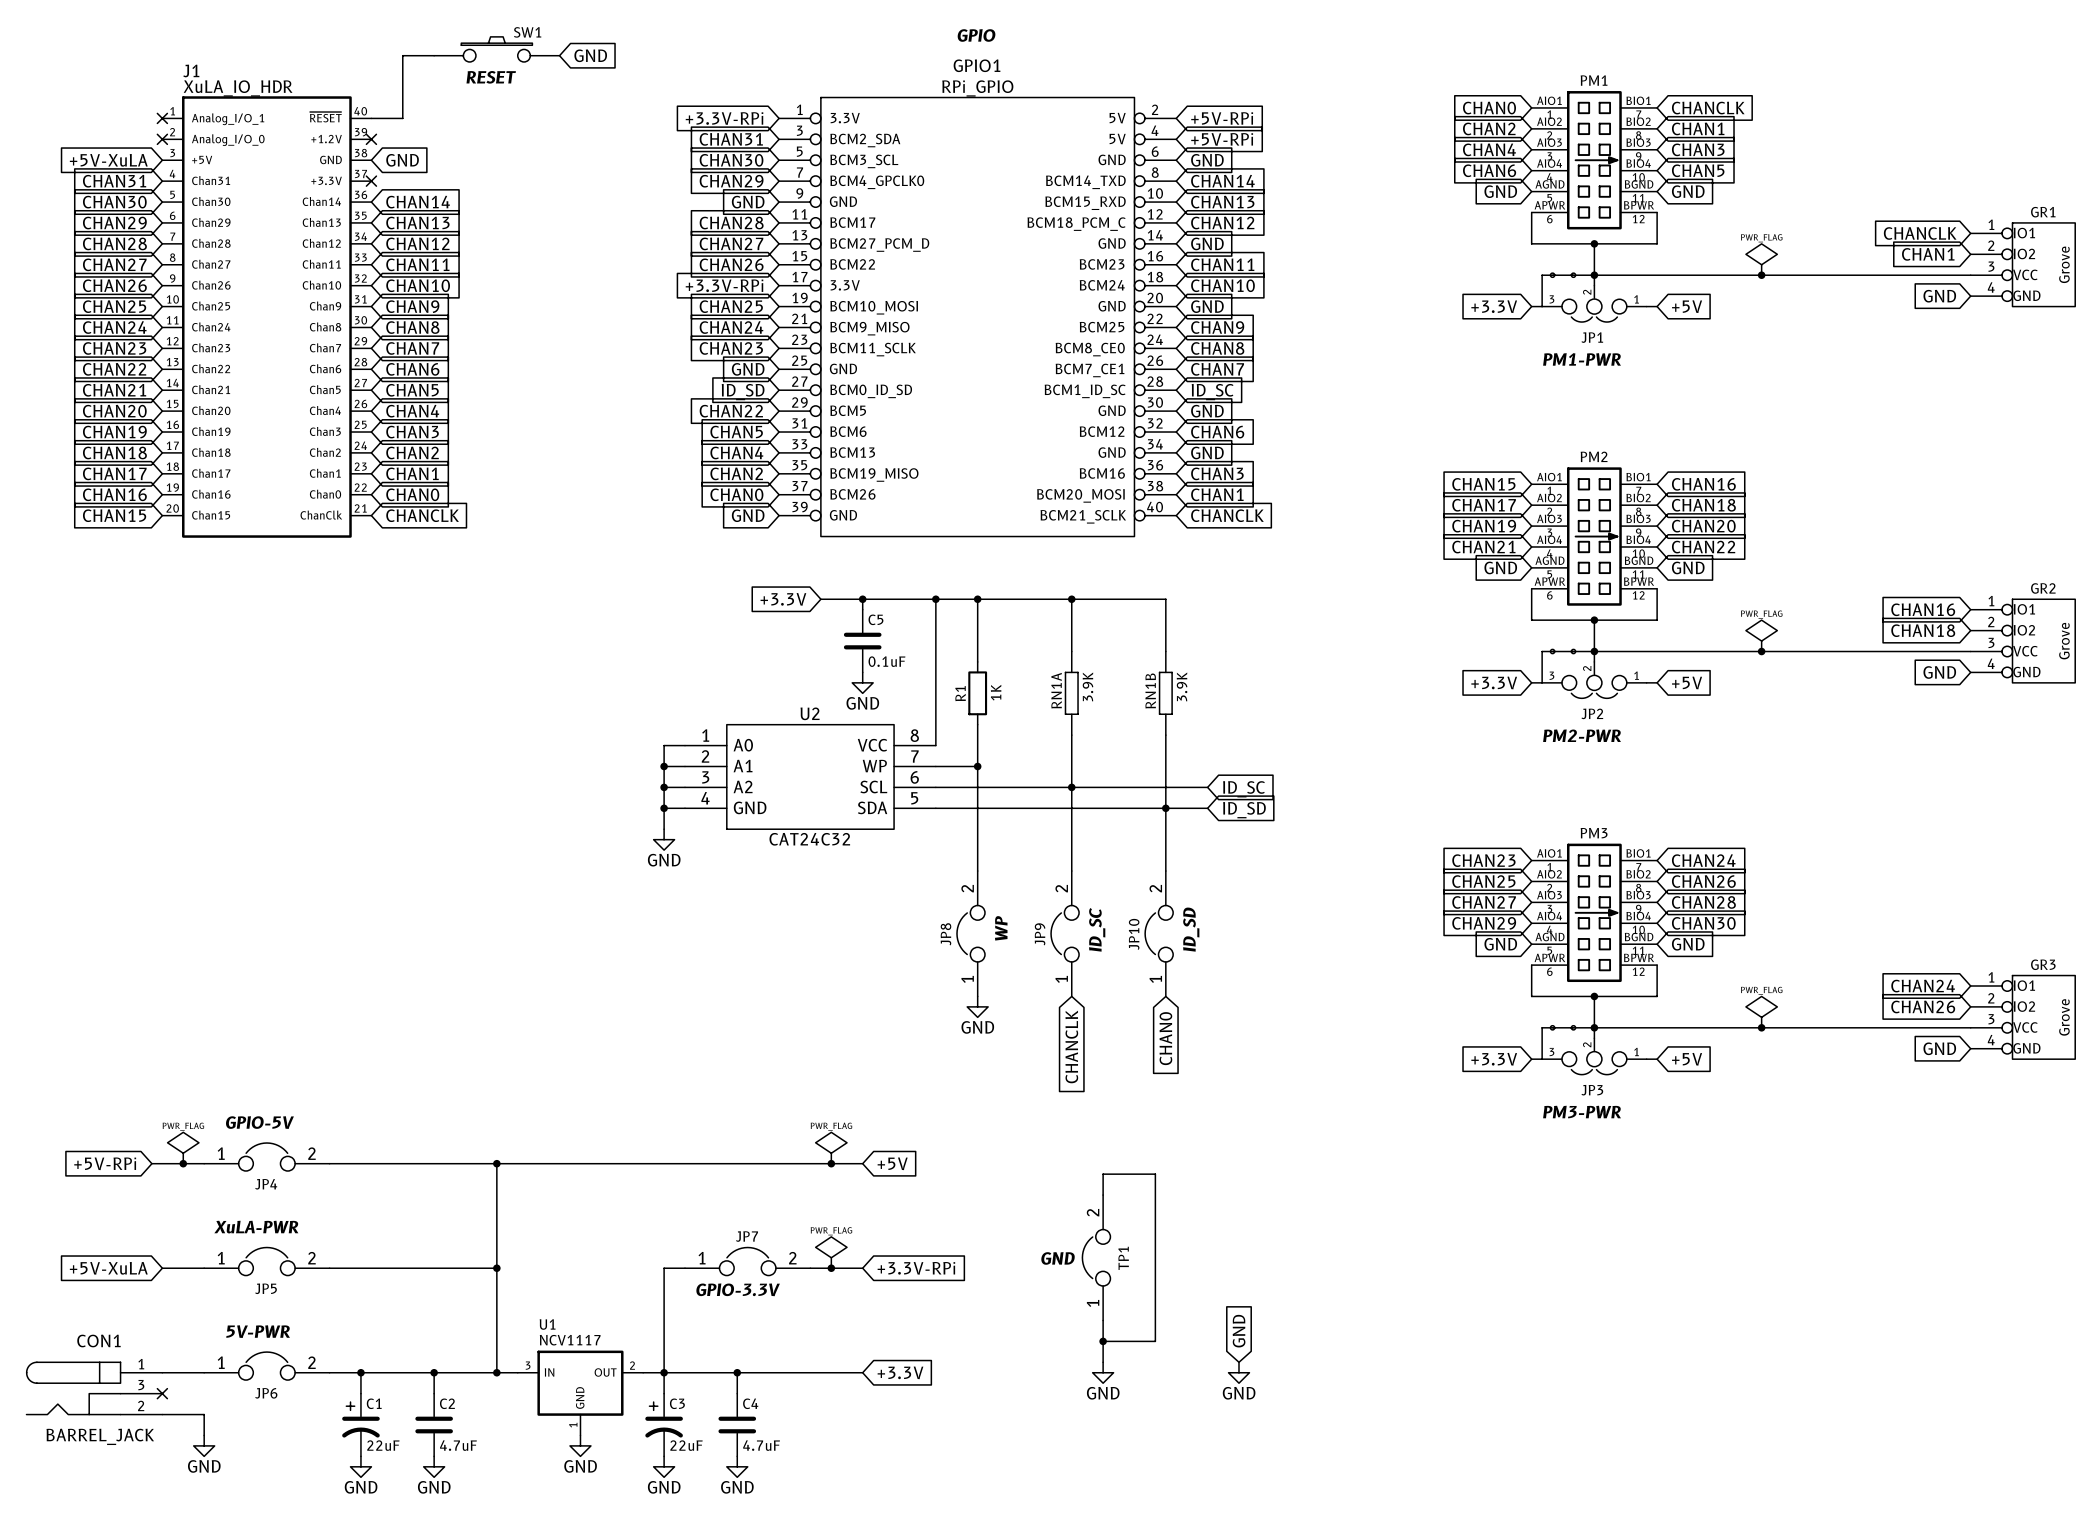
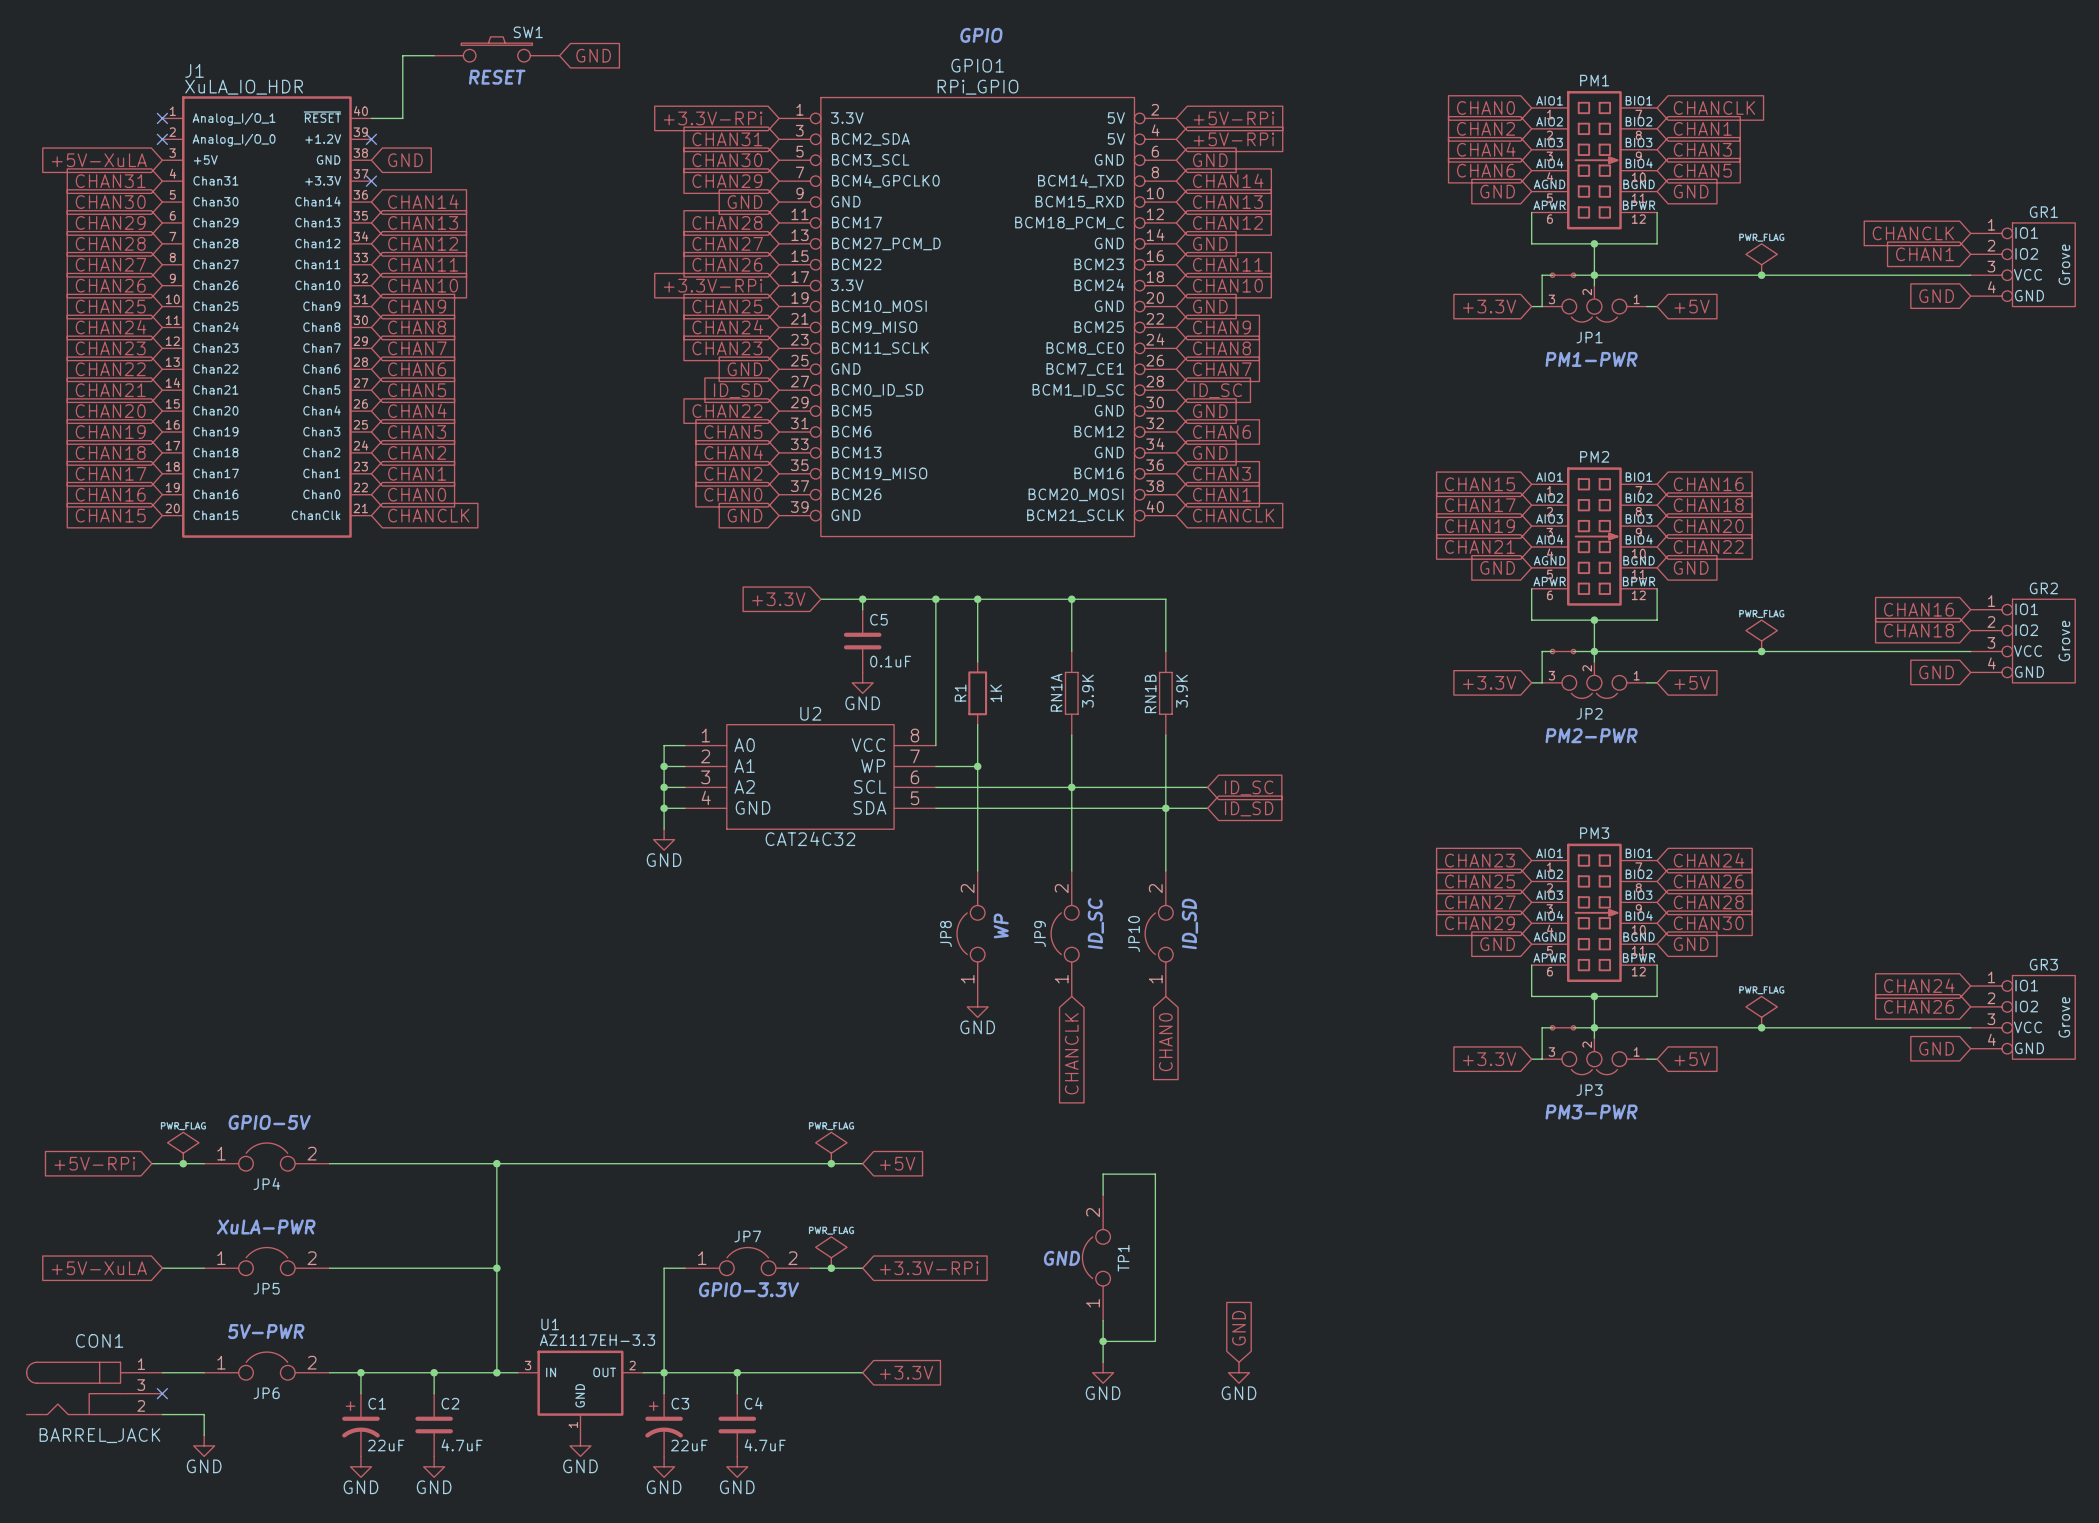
U1 value: NCV1117 (570, 1340) -> AZ1117EH-3.3 (597, 1340)

